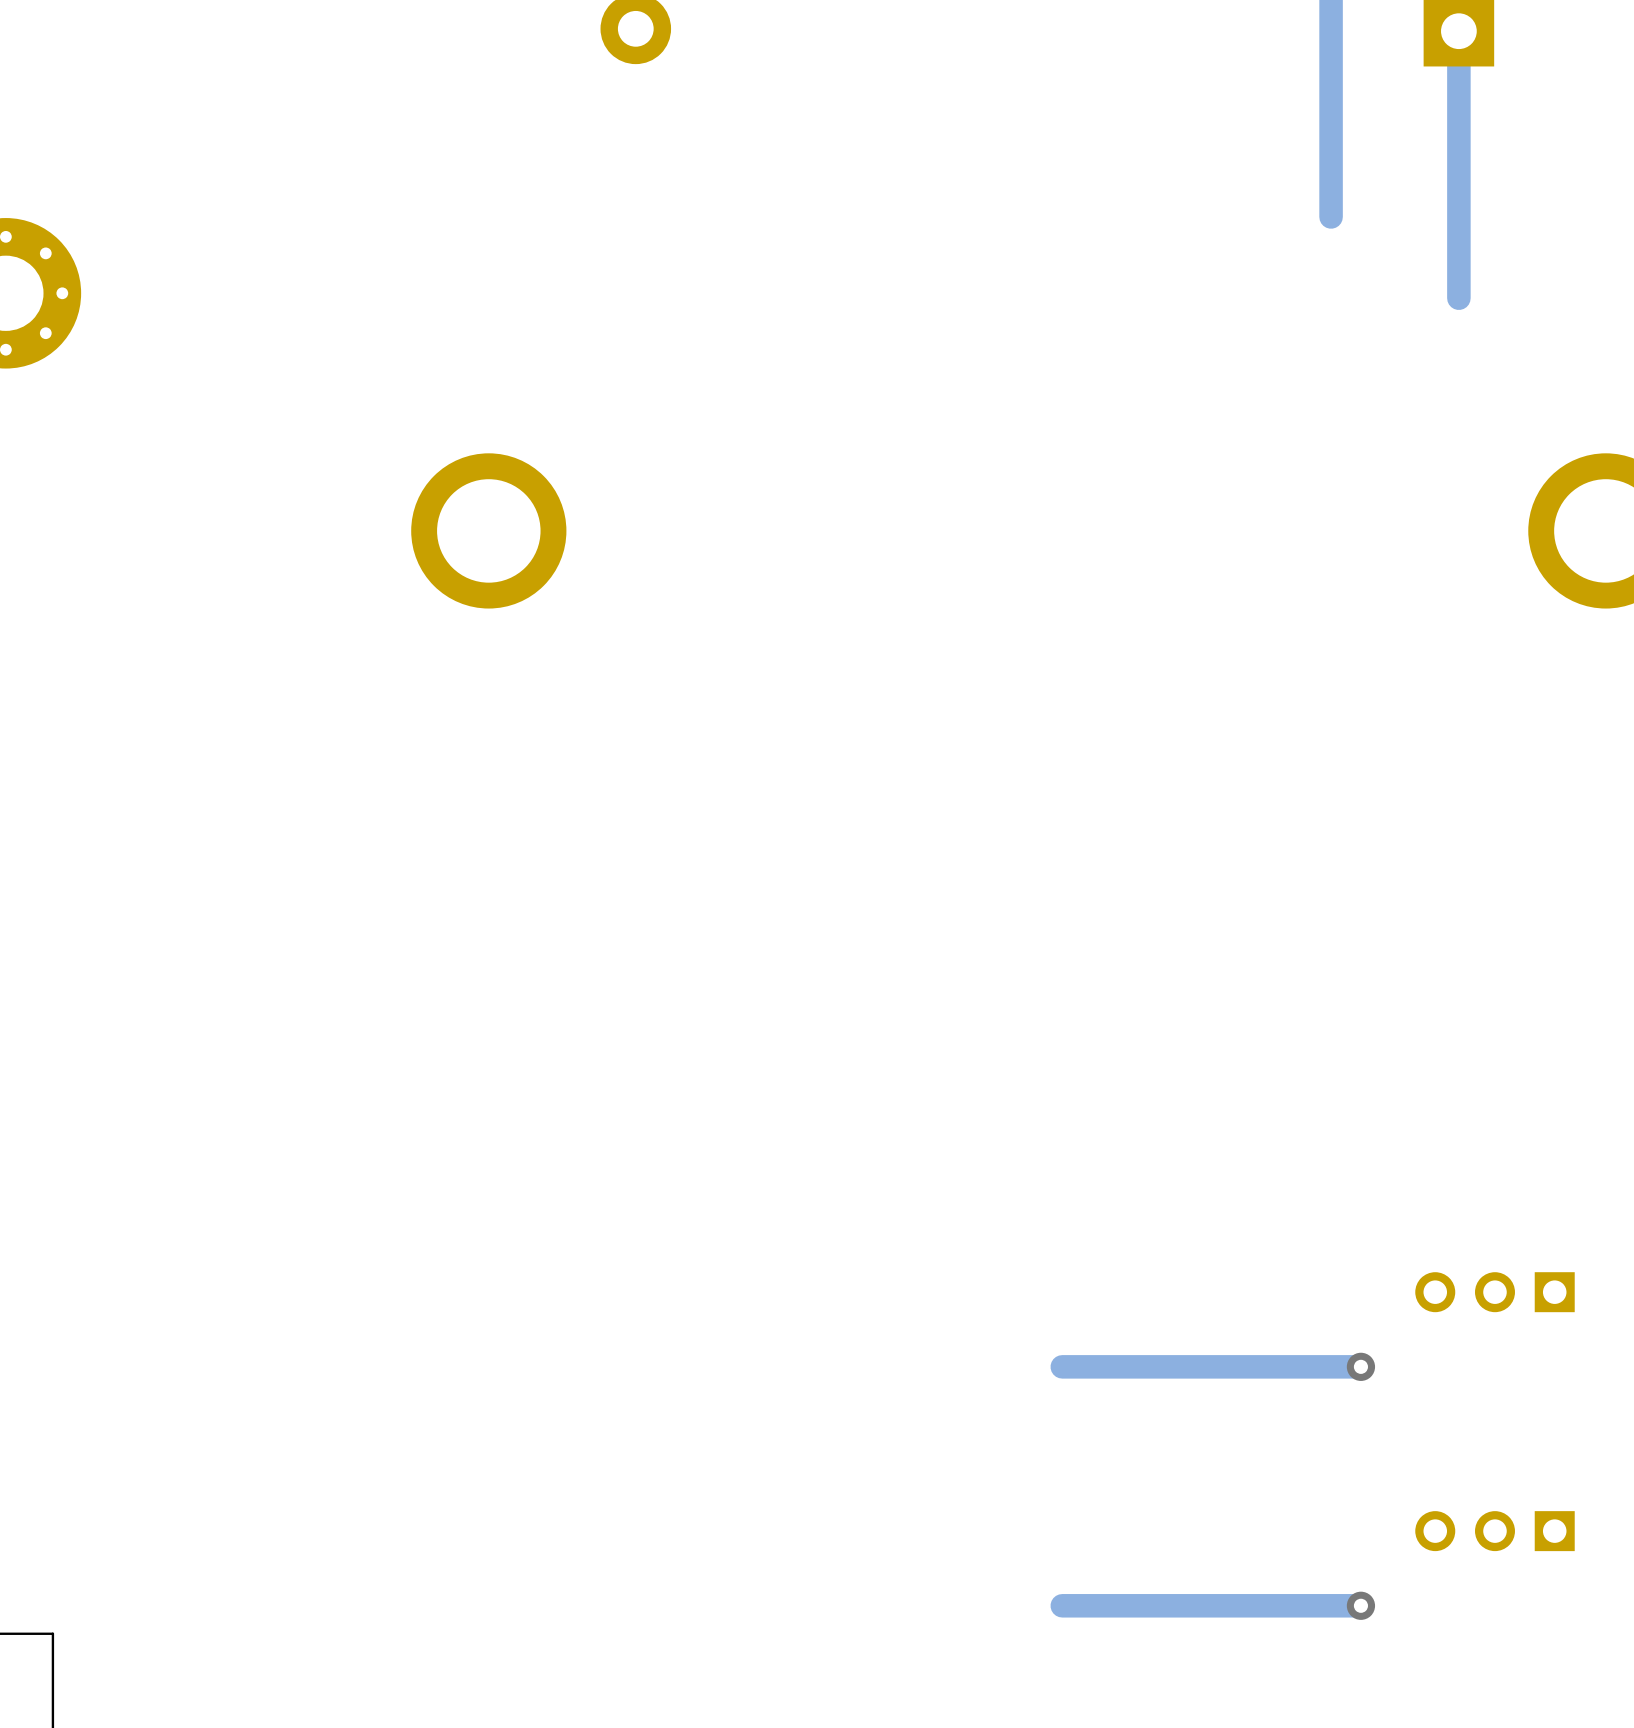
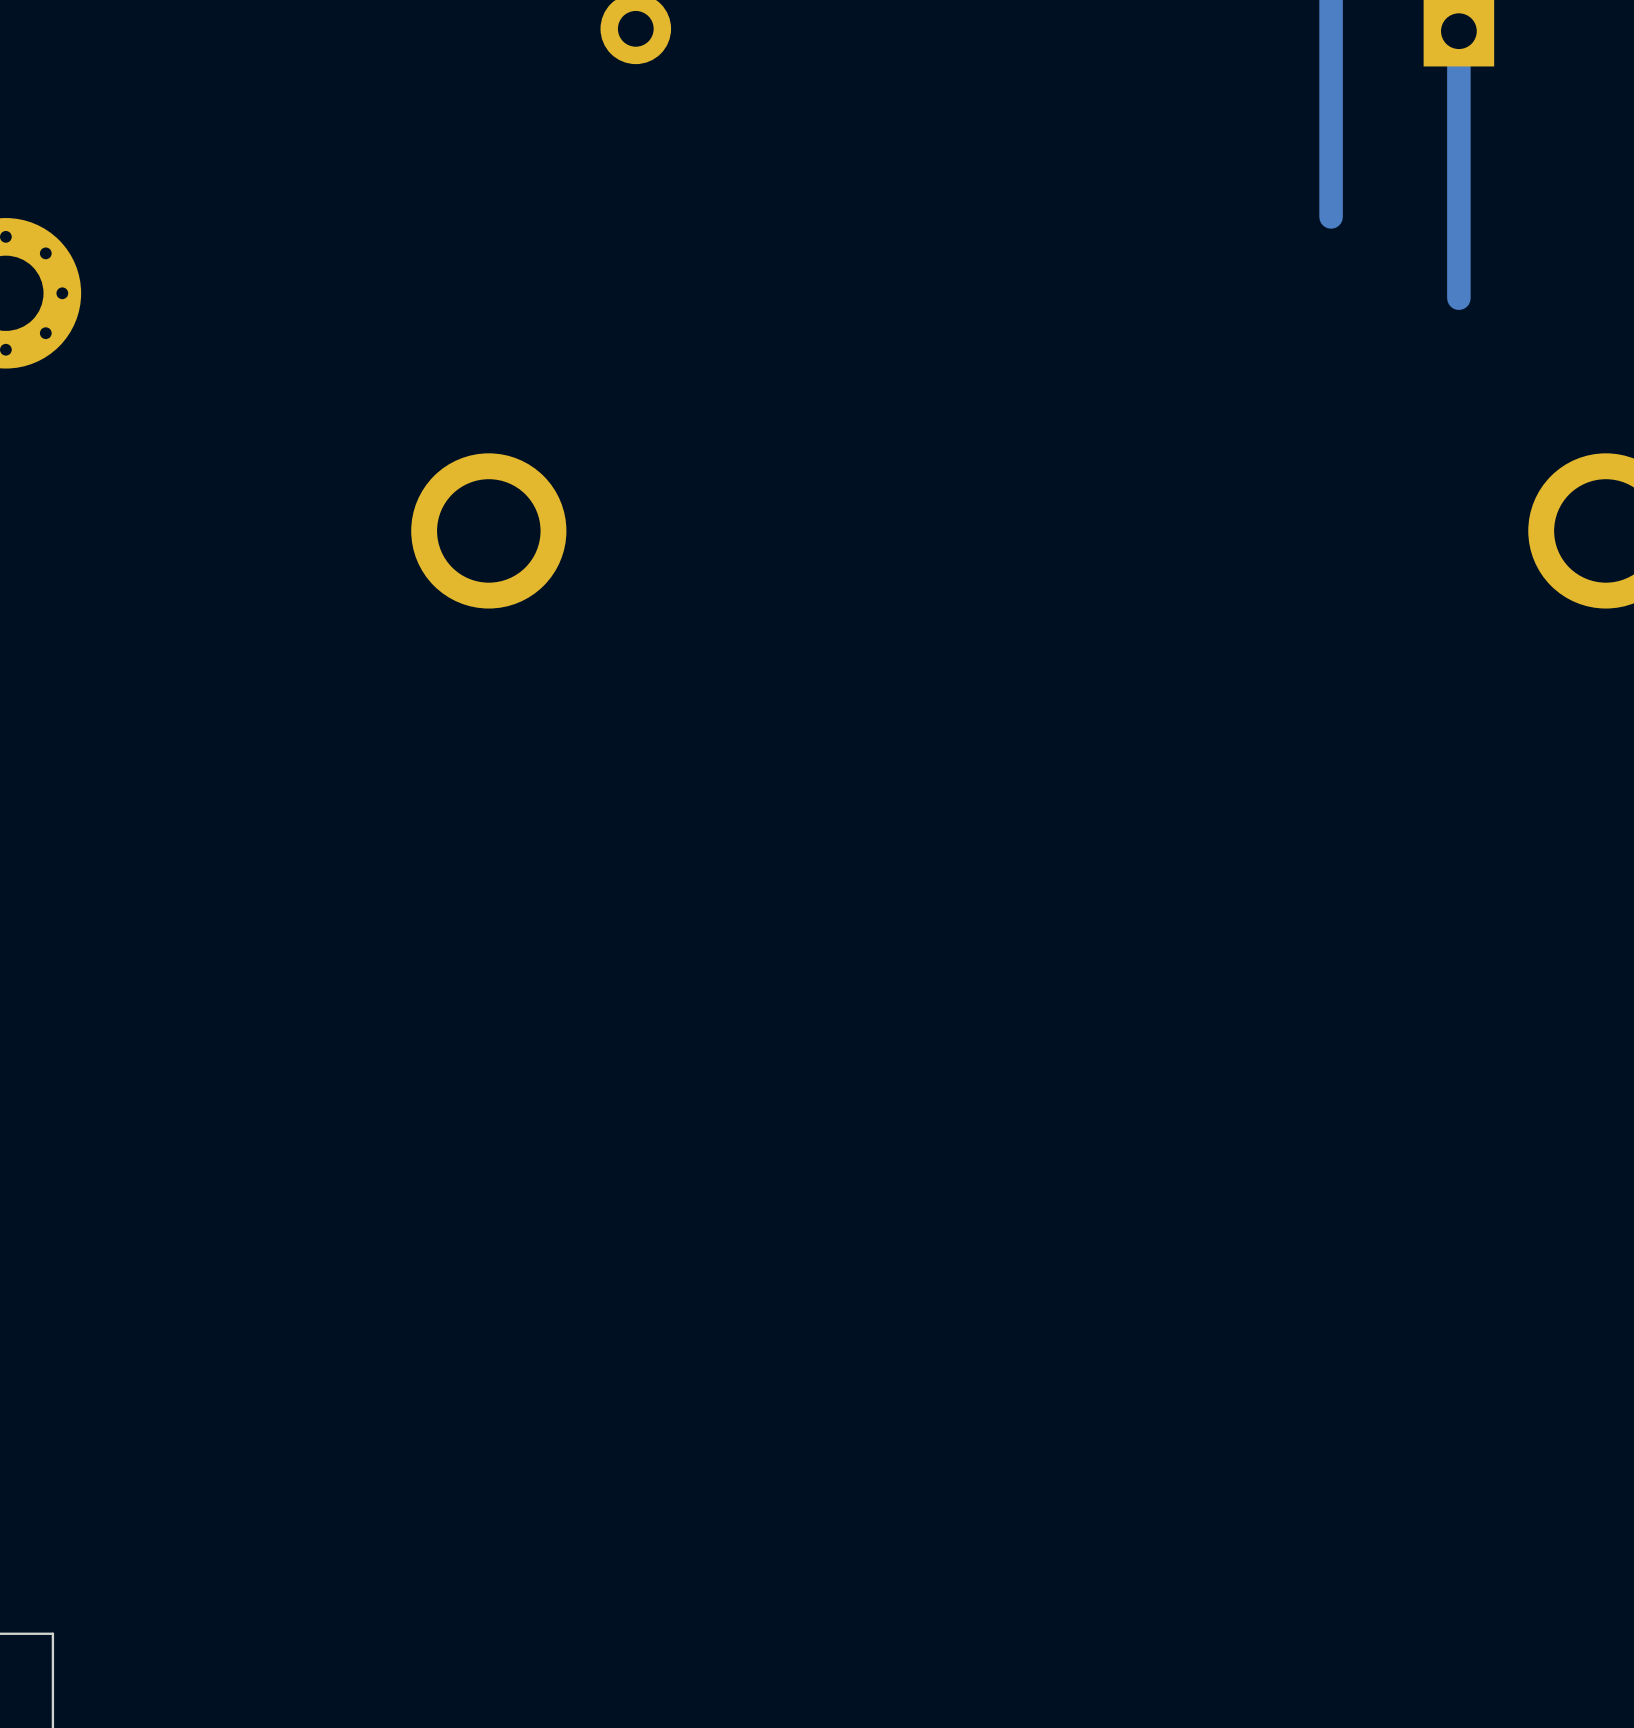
part: (1494, 1292) -> none
track: (1360, 1366) (1062, 1366) -> none
via: (1360, 1366) -> none
part: (1494, 1531) -> none
track: (1360, 1605) (1062, 1605) -> none
via: (1360, 1605) -> none

